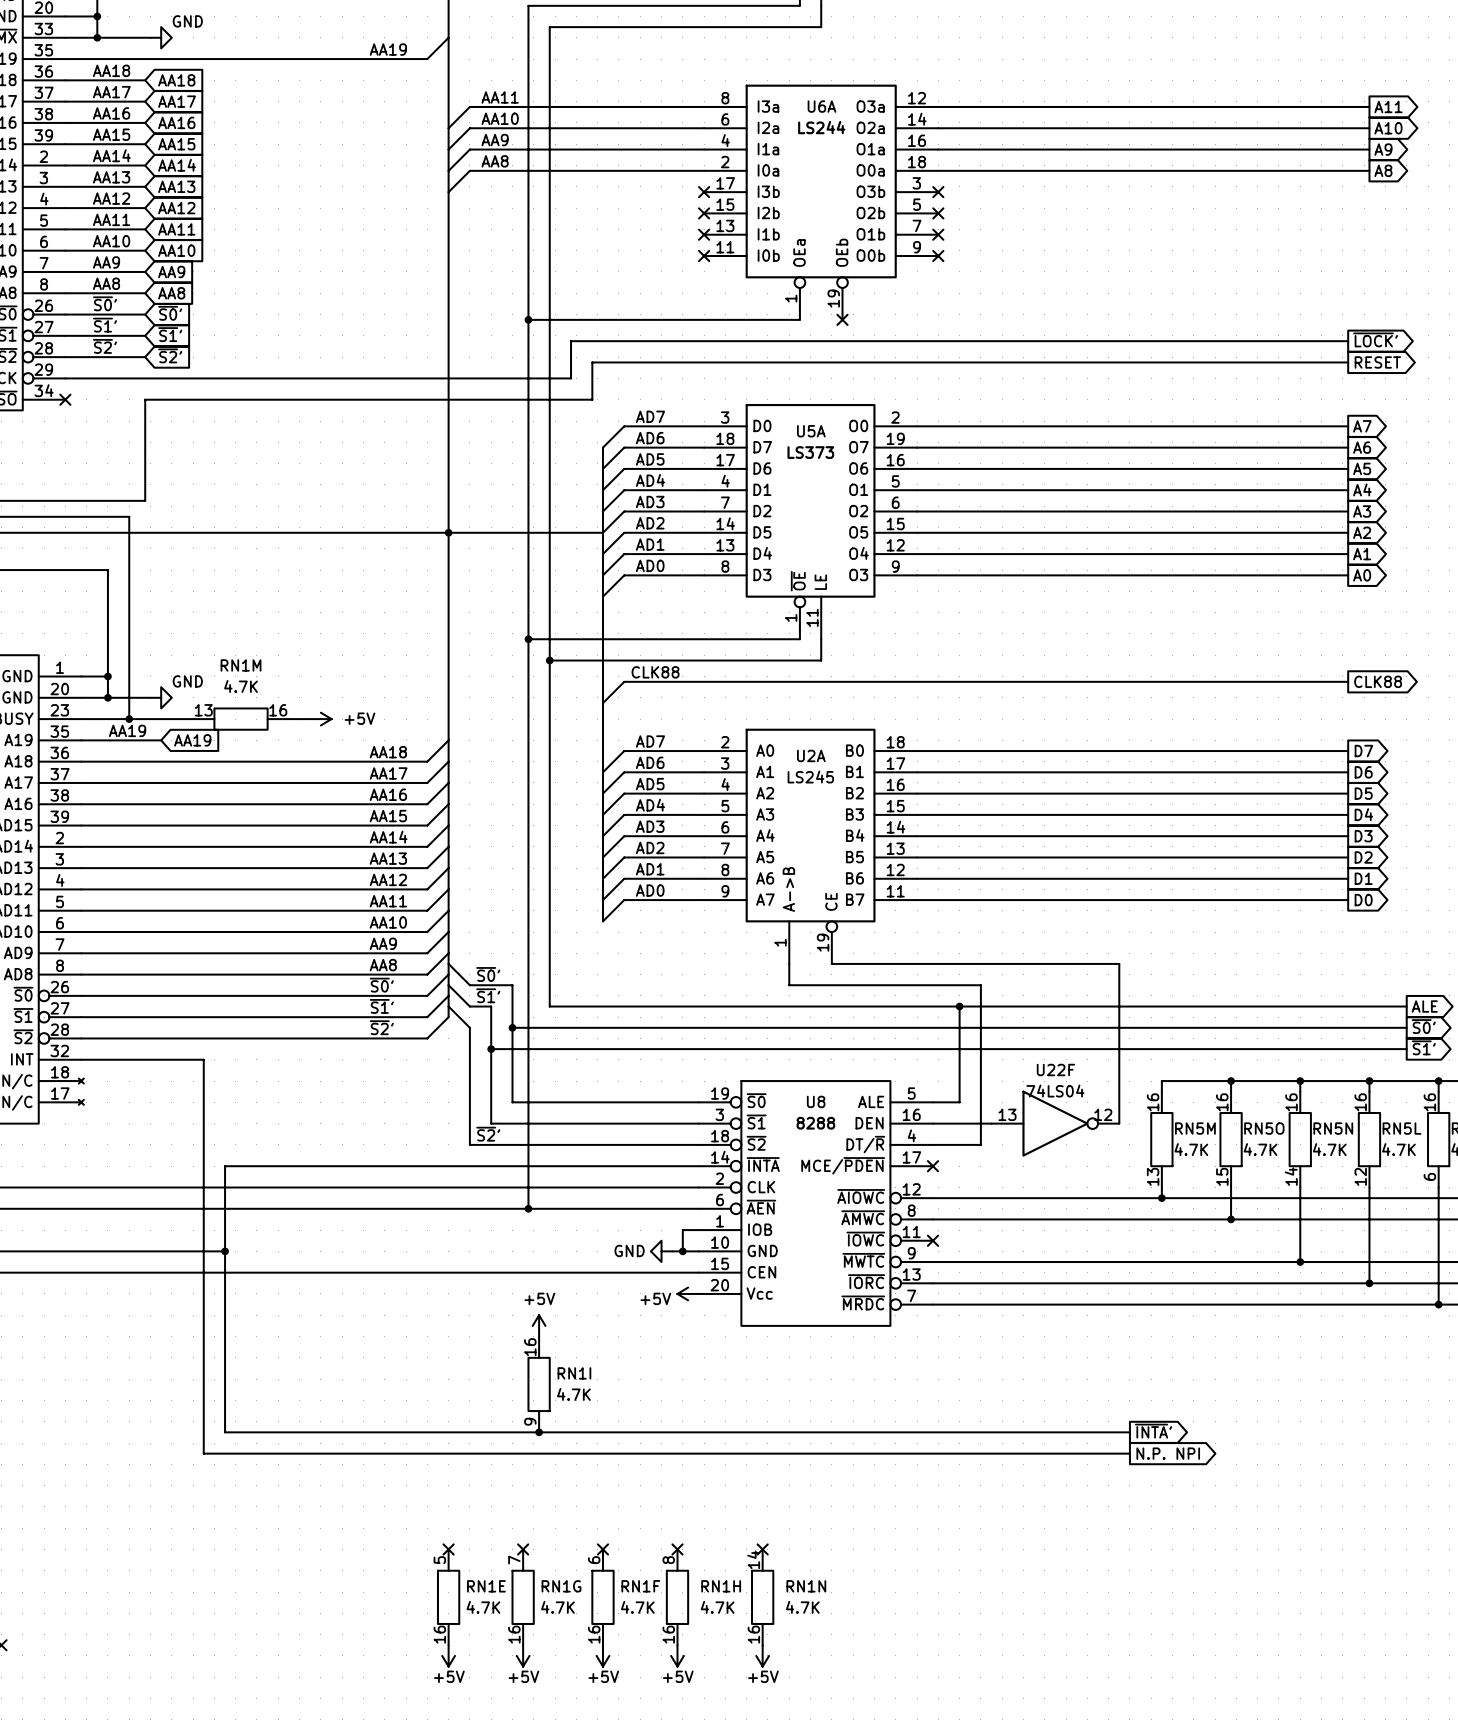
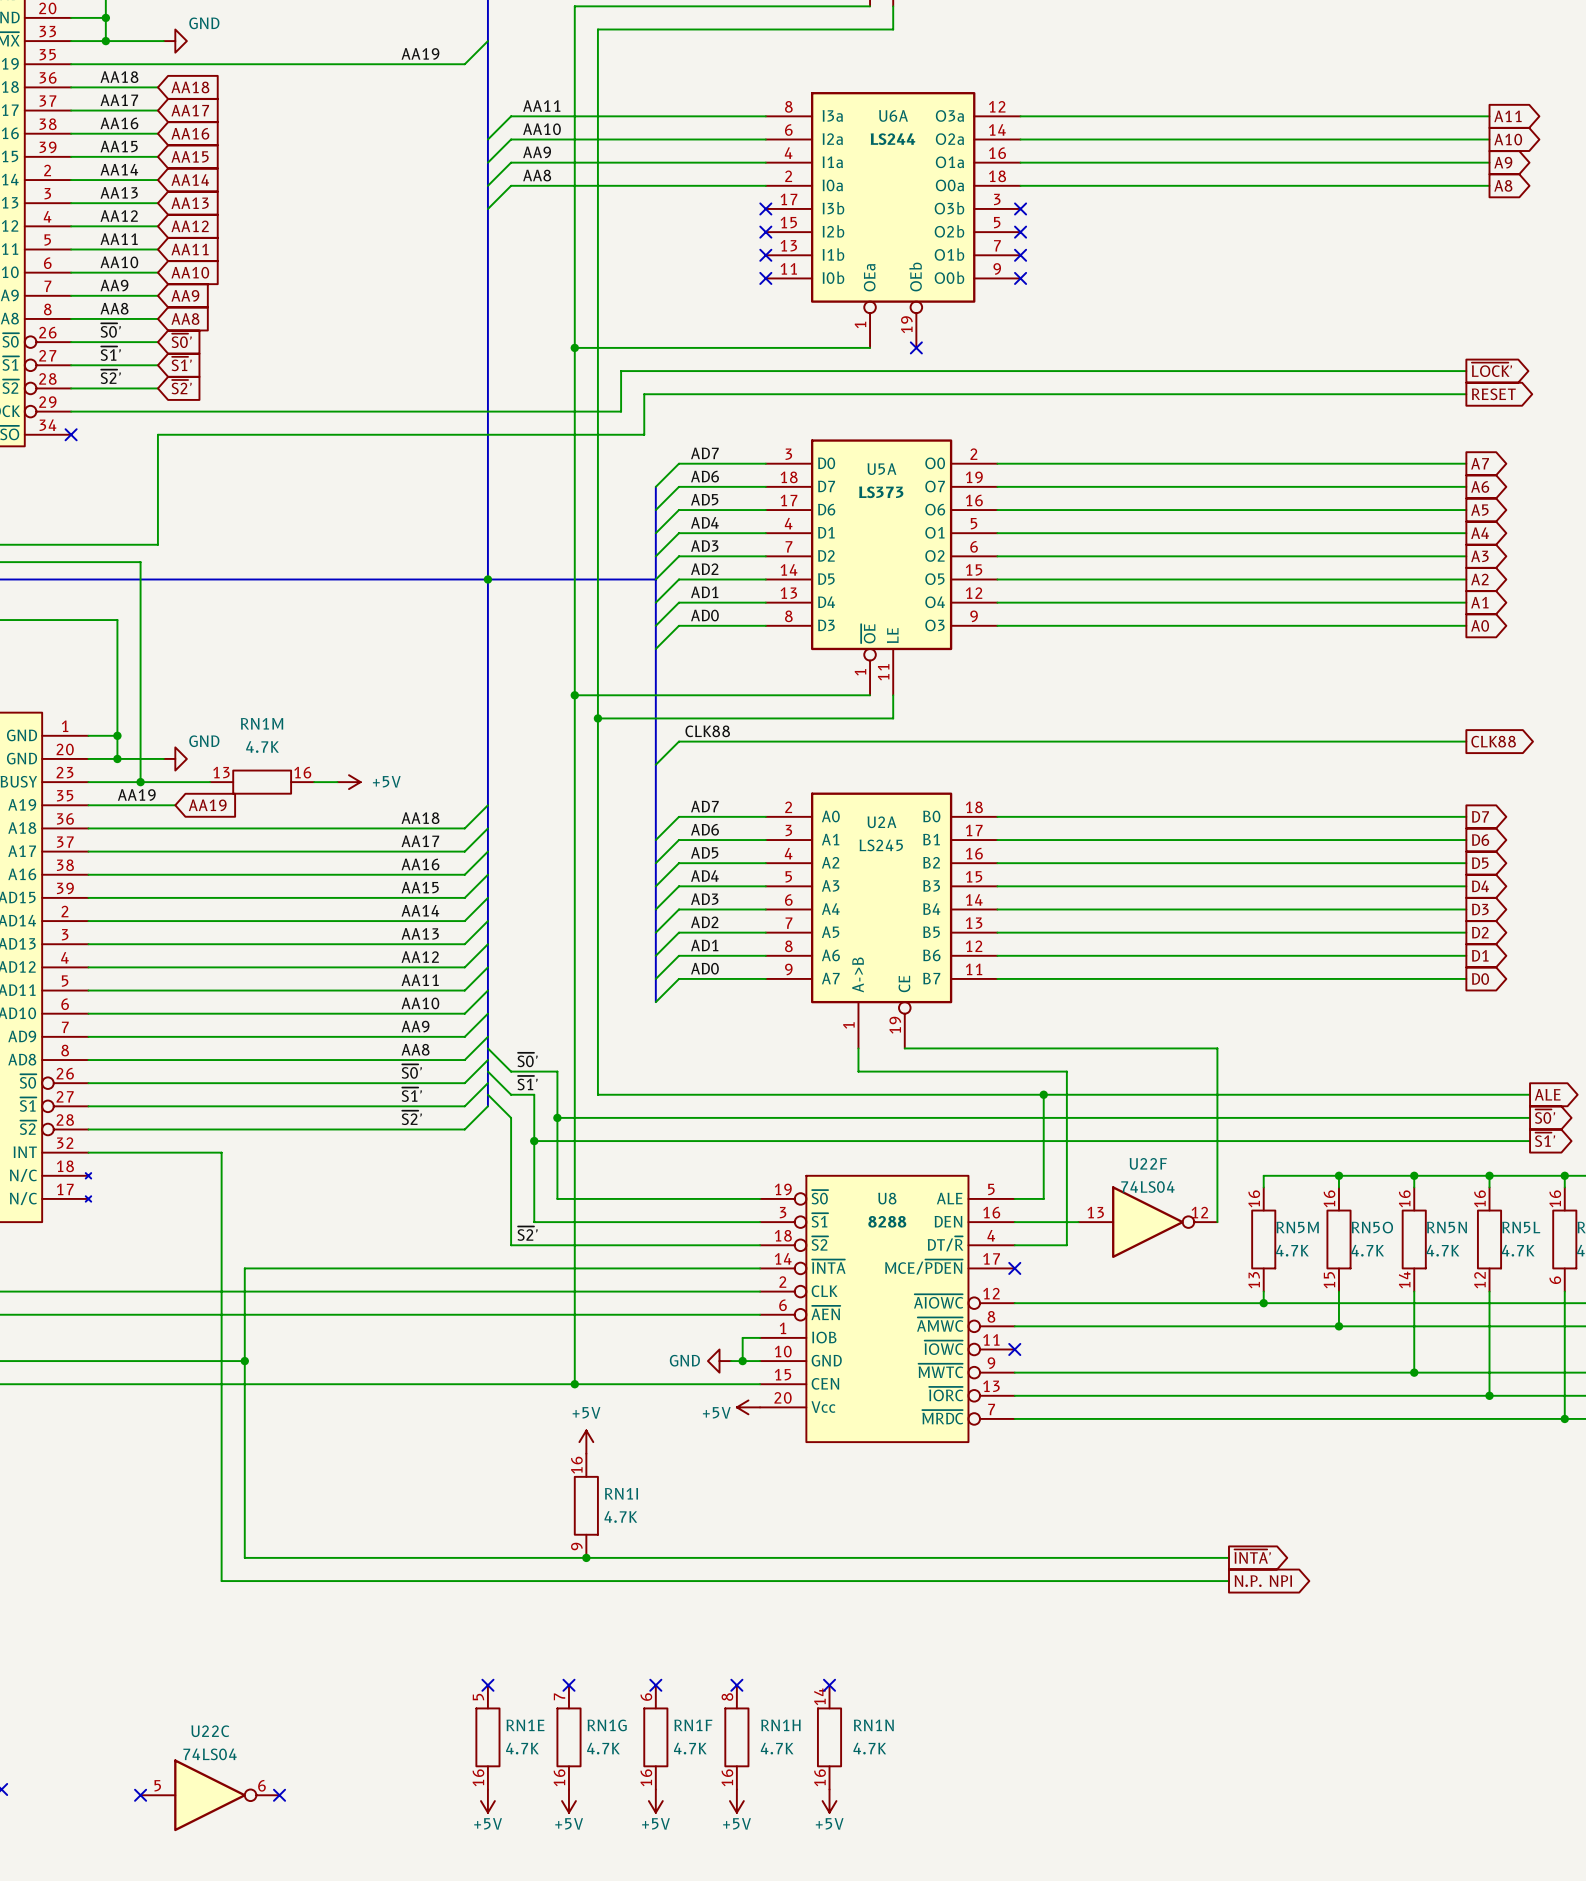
wire: none -> (574, 1314) (574, 1384)
junction: (528, 1208) -> none
junction: none -> (574, 1384)
no-connect mark: none -> (140, 1795)
U22C: none -> 74LS04 (210, 1795)
no-connect mark: none -> (279, 1795)

